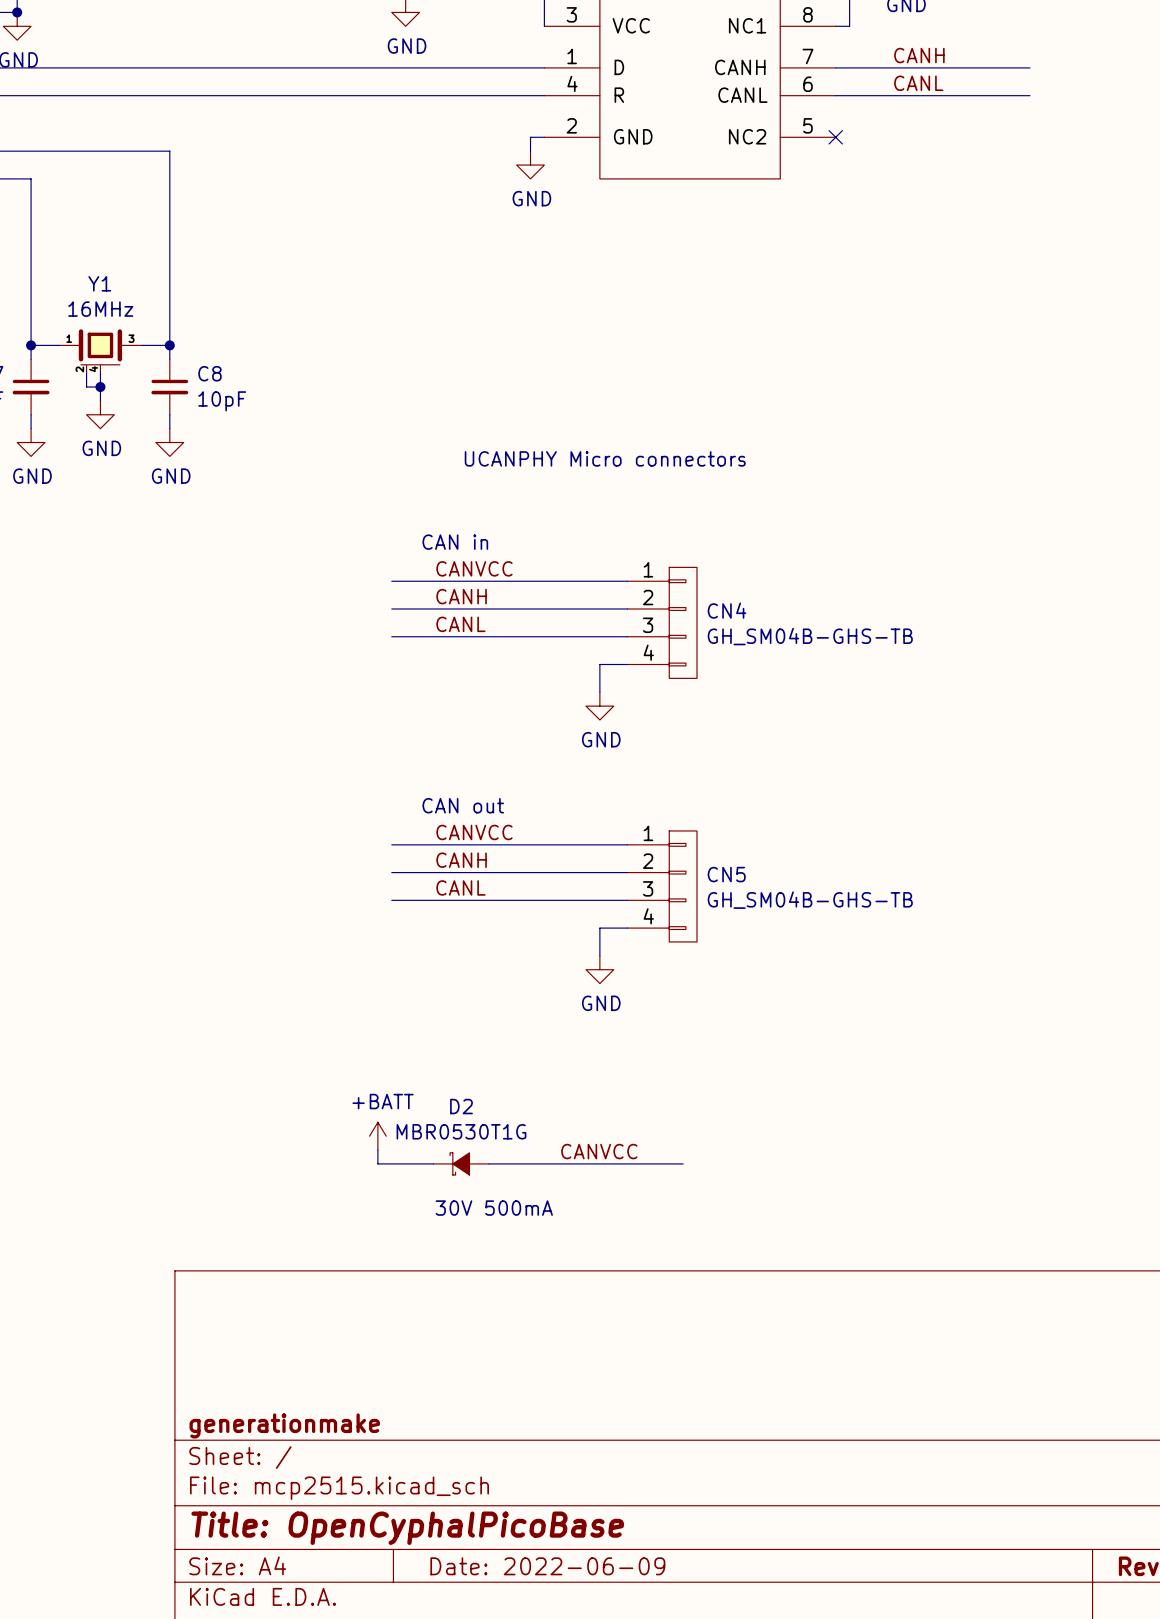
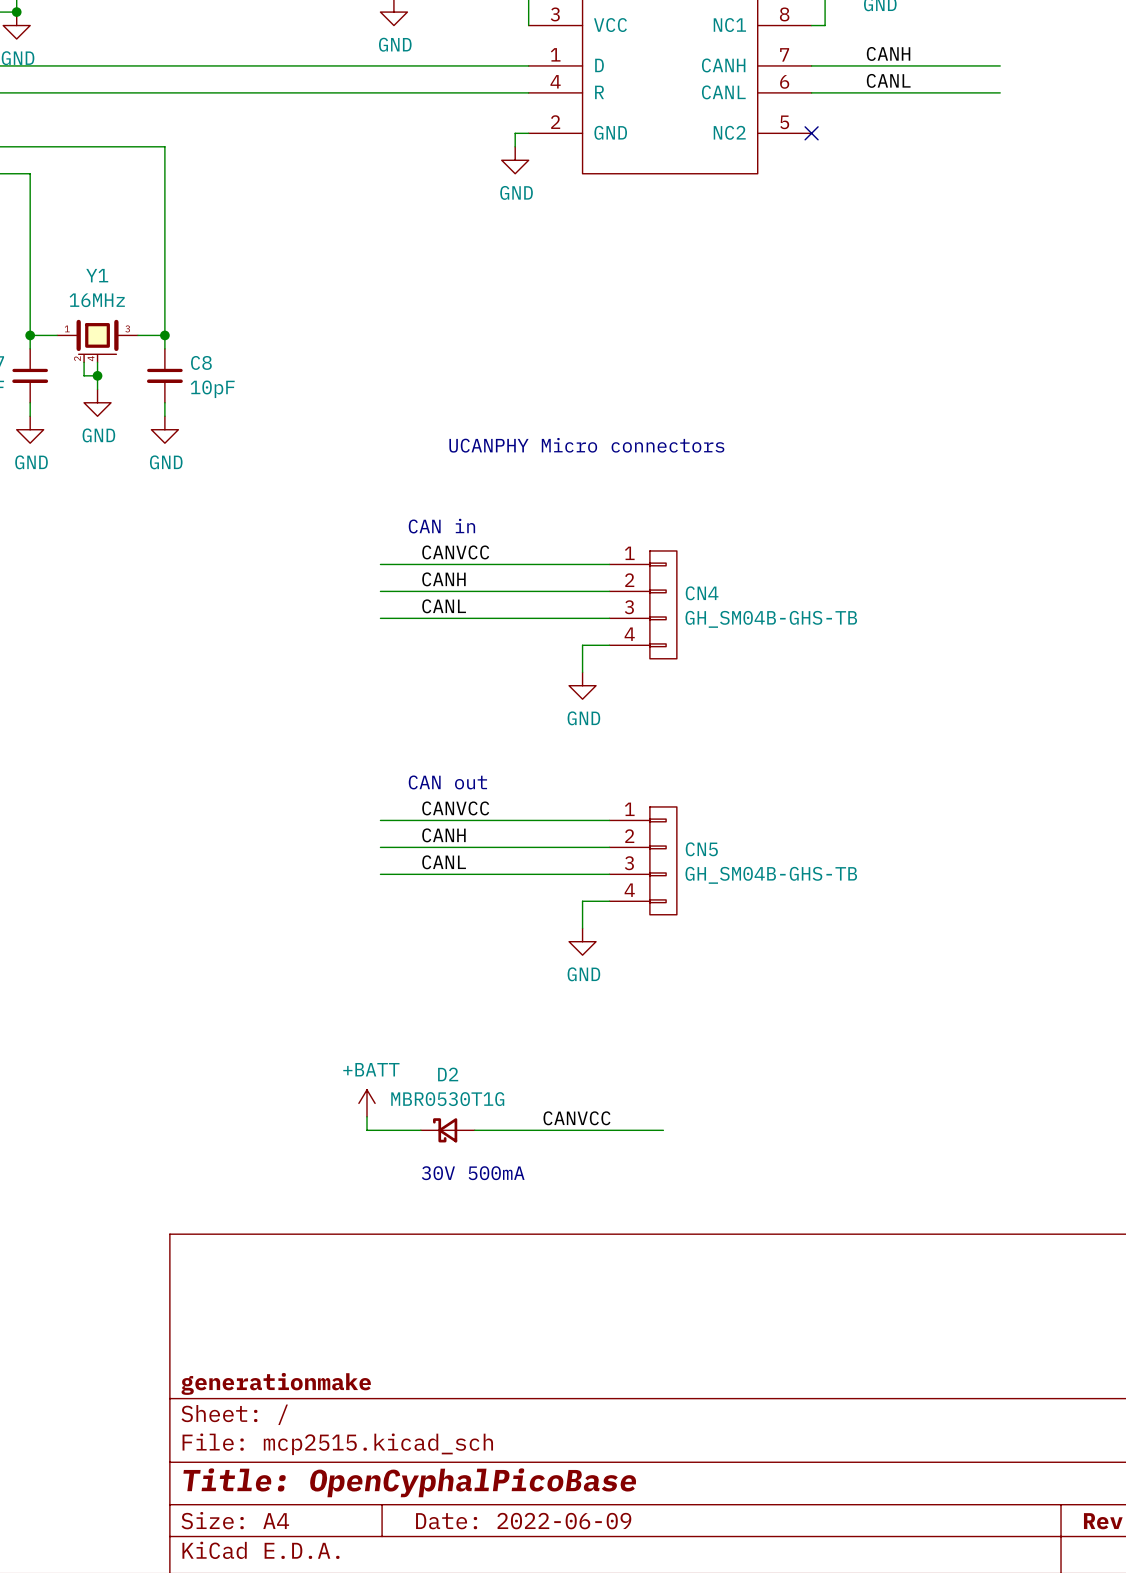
D2 symbol: [433, 1152, 489, 1176] -> [420, 1118, 475, 1143]

